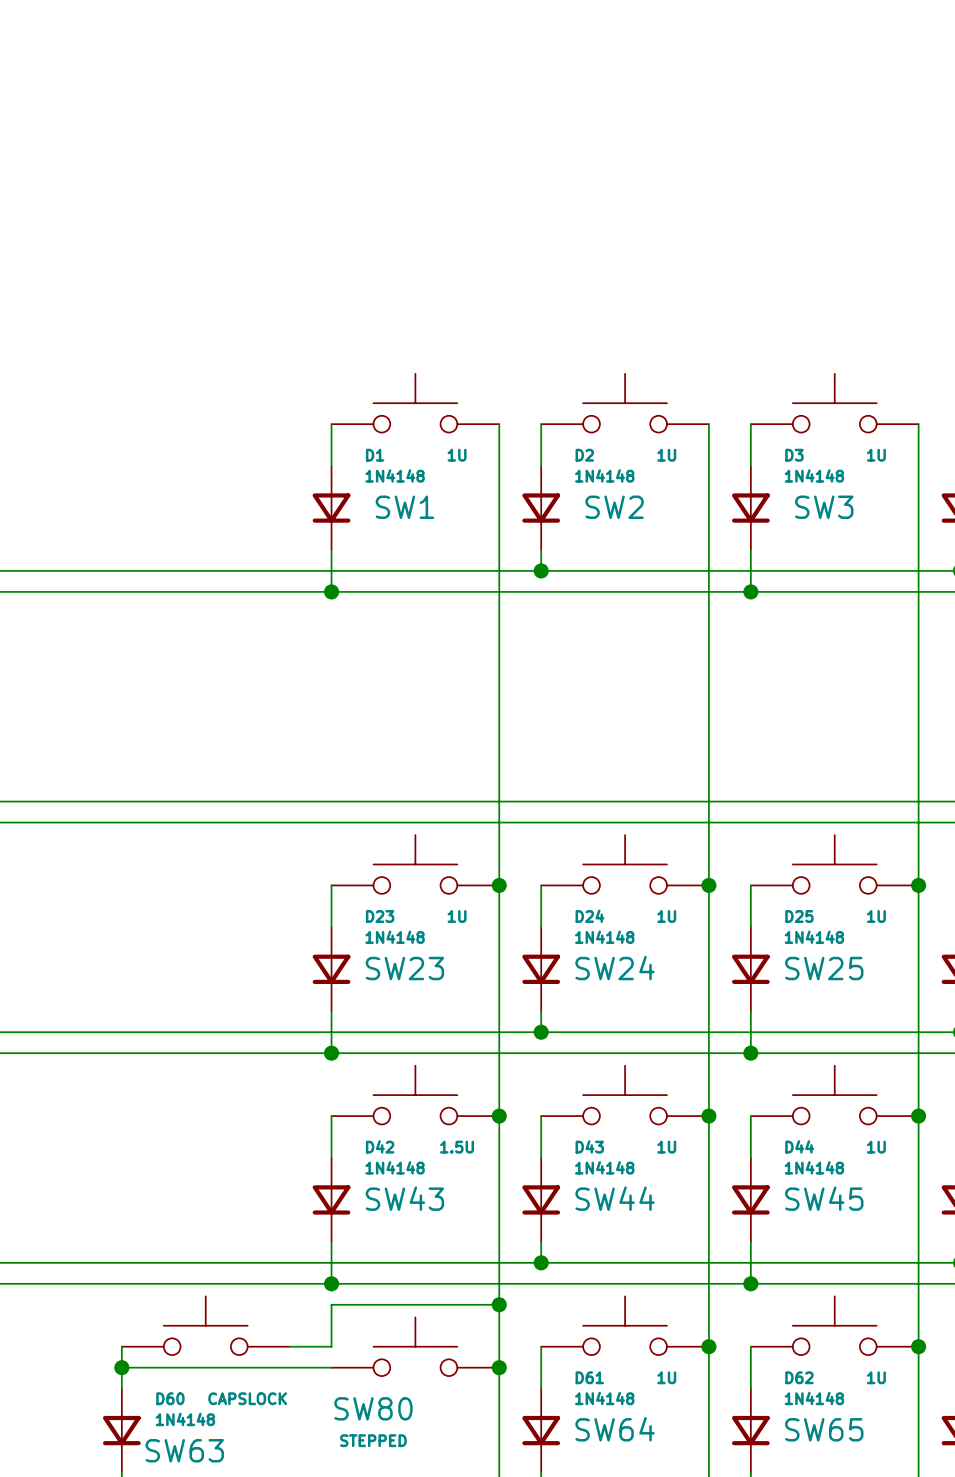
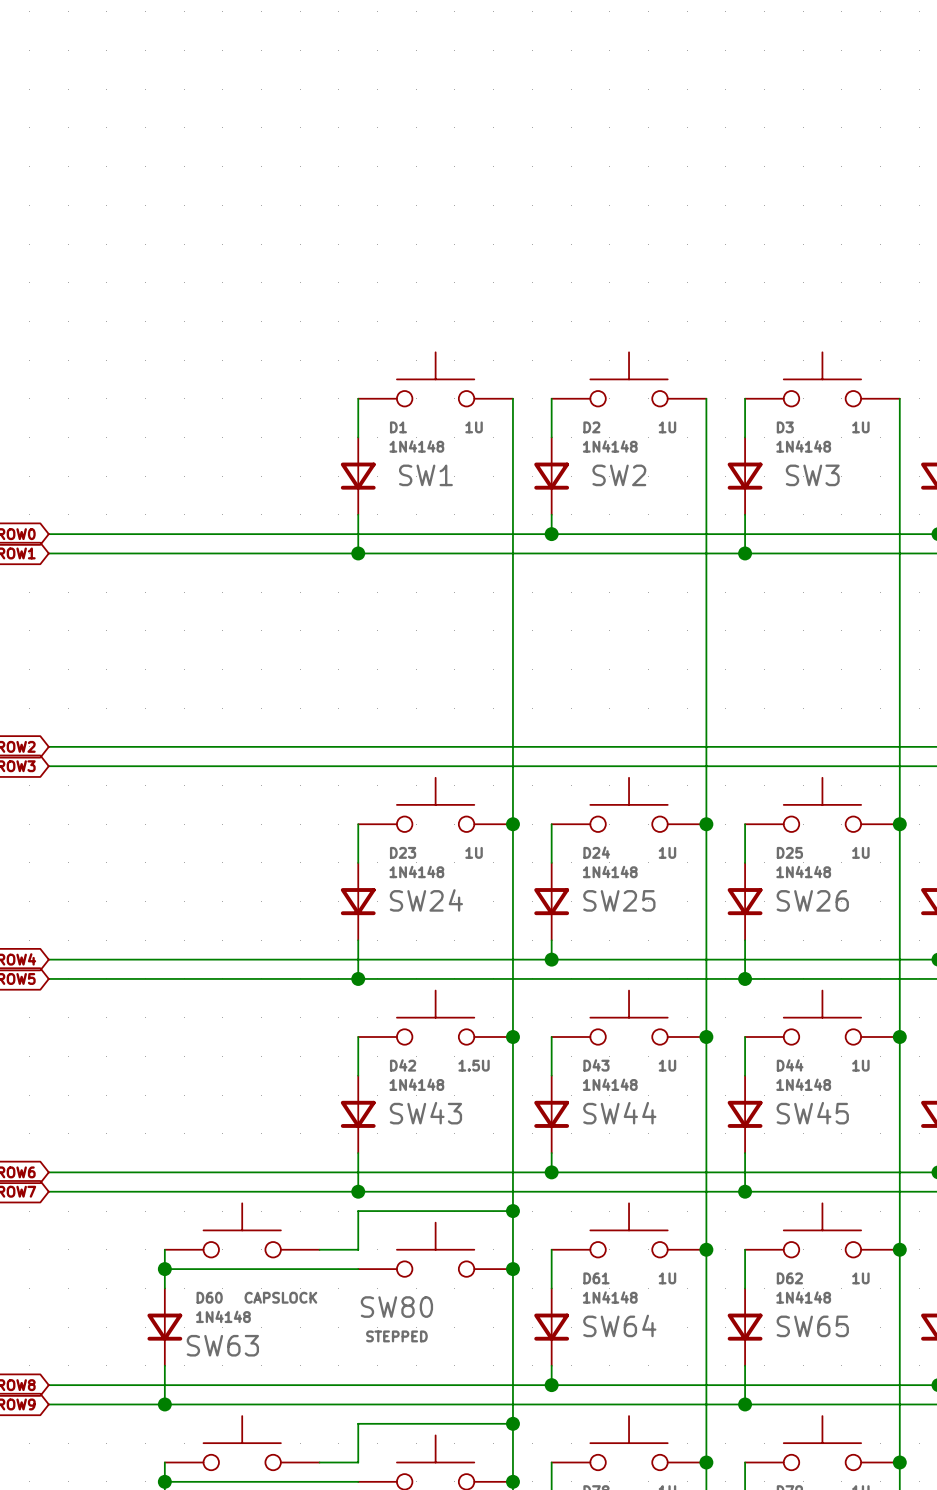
SW23 name: SW23 (404, 968) -> SW24 (426, 900)
SW24 name: SW24 (615, 968) -> SW25 (619, 900)
SW25 name: SW25 (824, 968) -> SW26 (812, 900)

